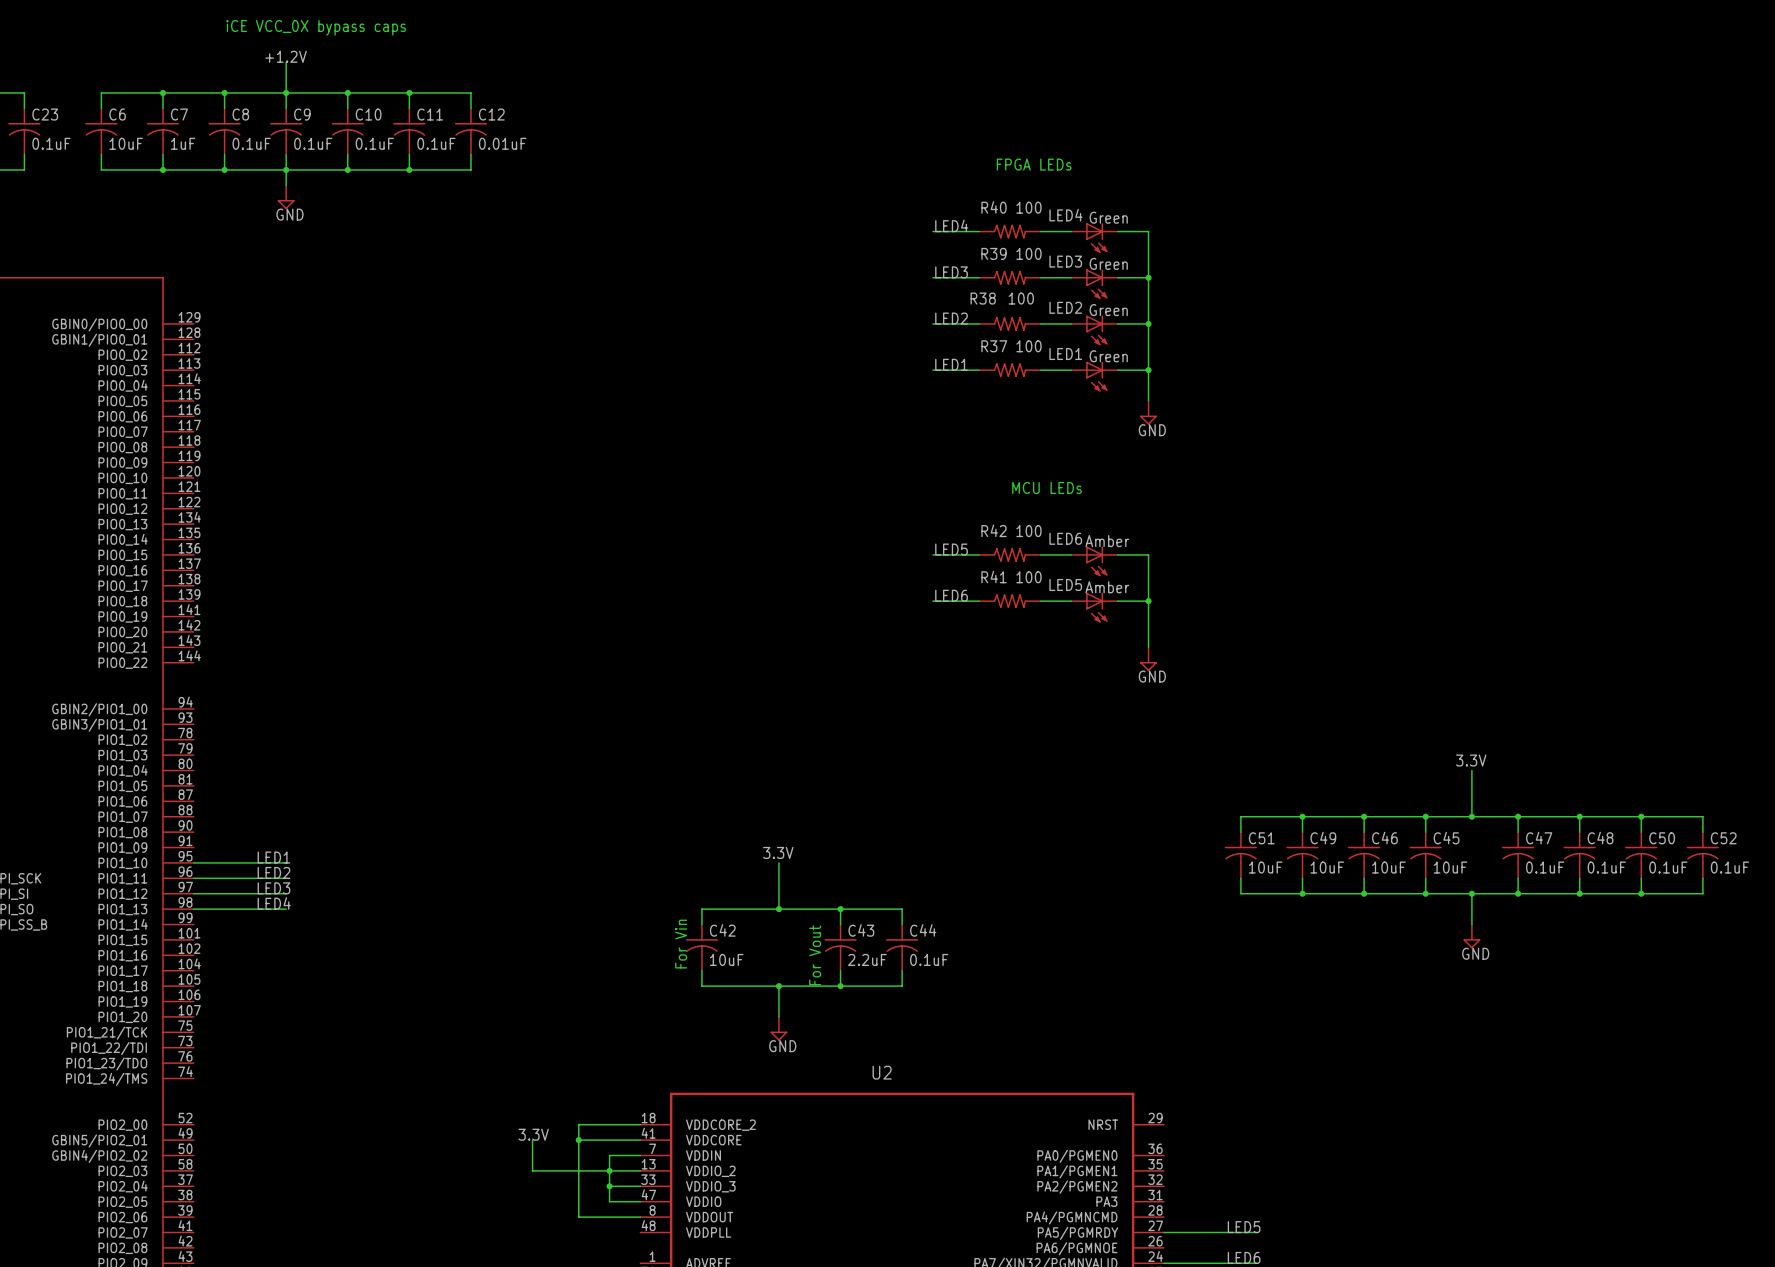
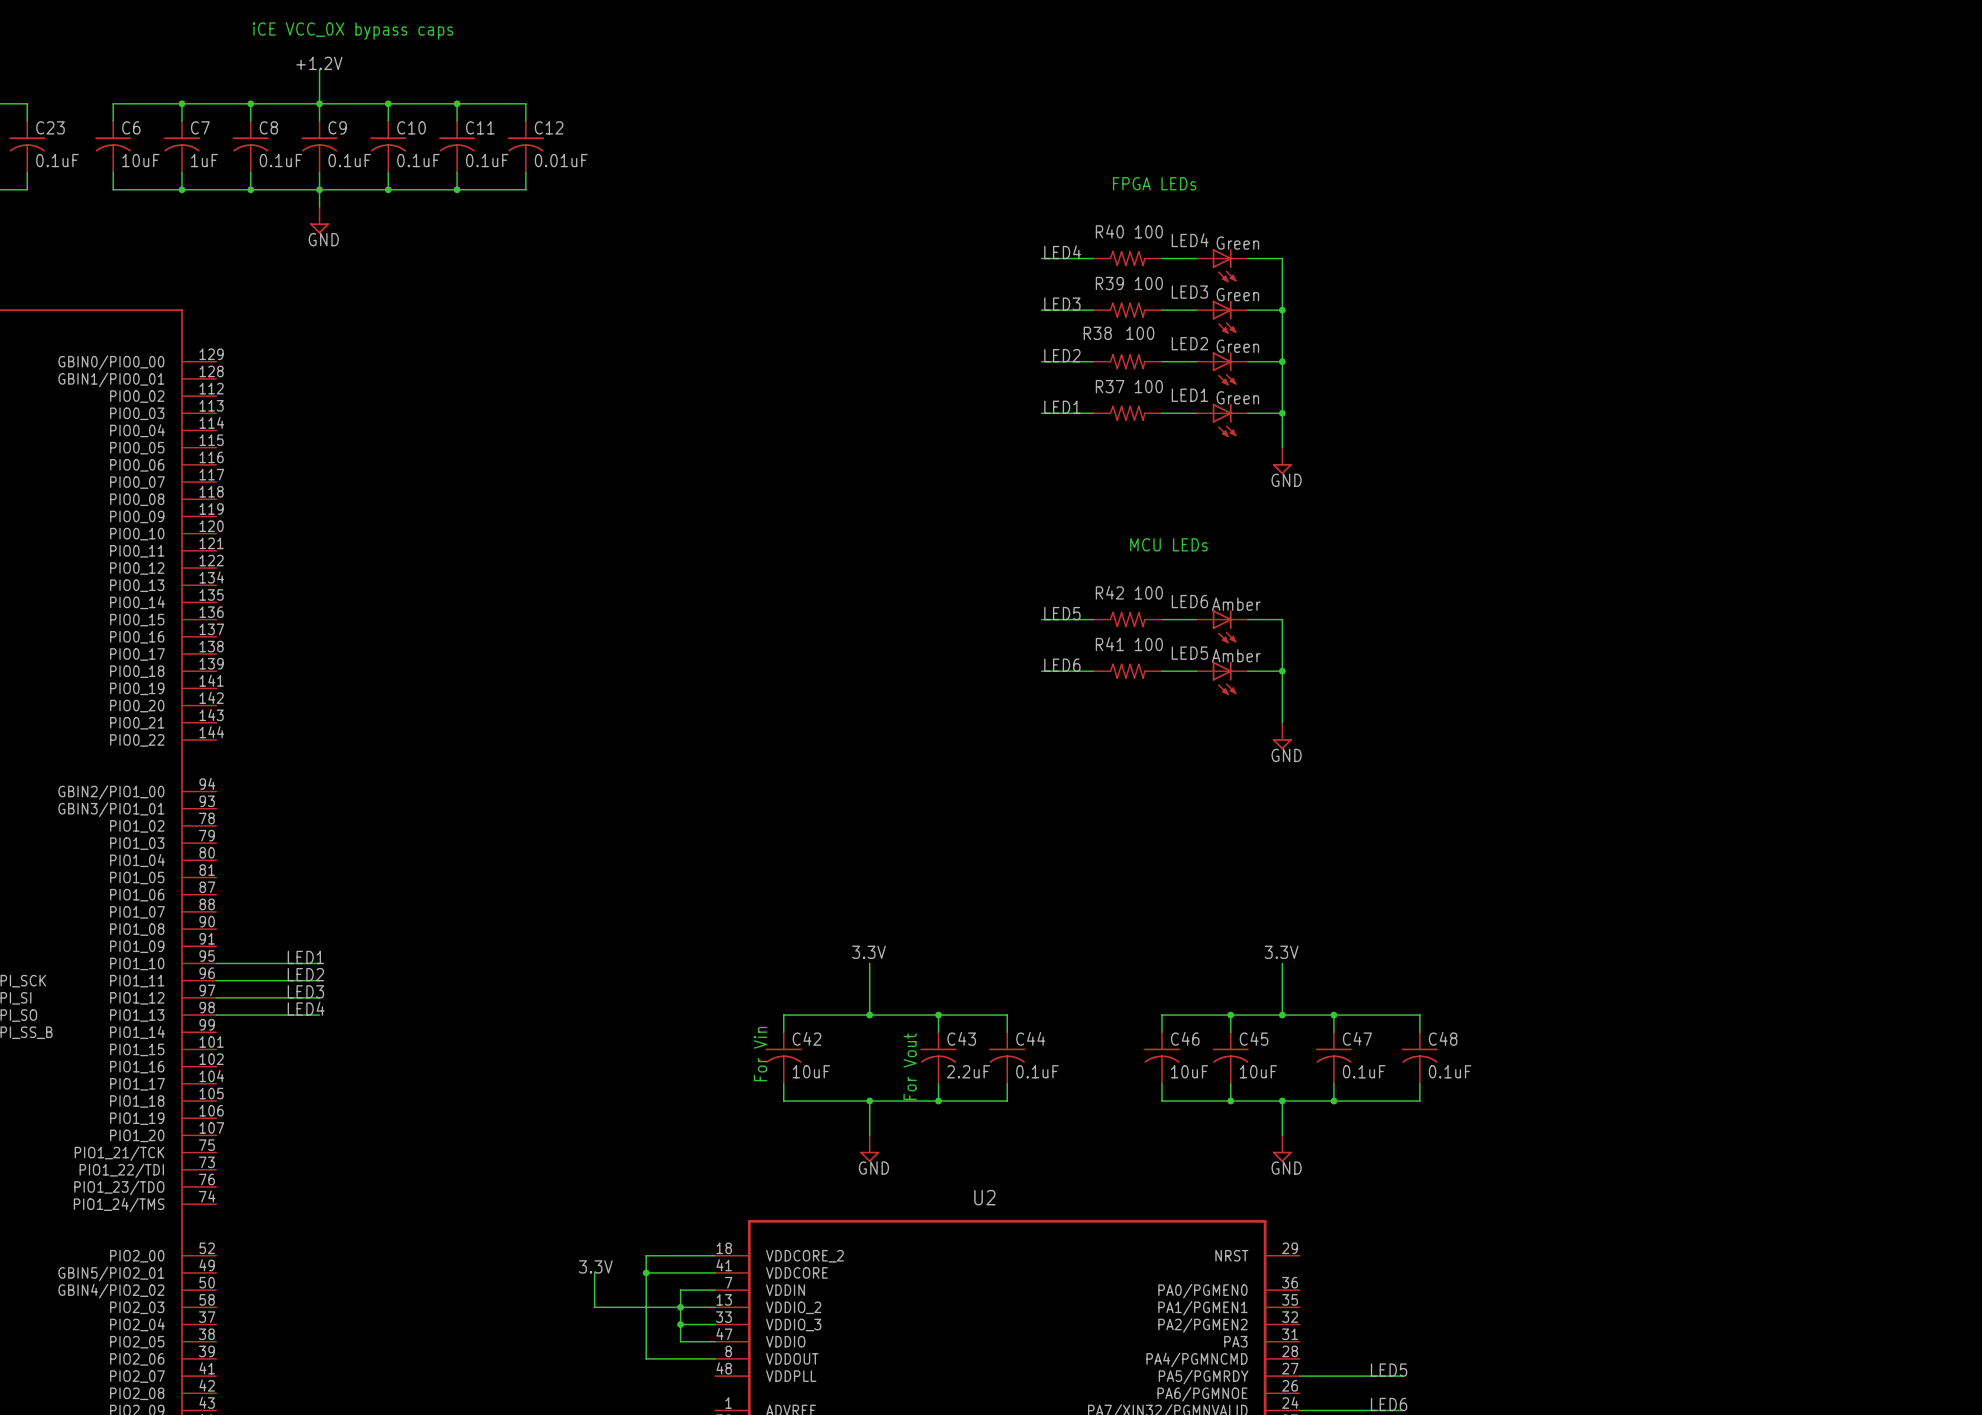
label: 3.3V (1471, 760) -> none
wire: (1471, 770) (1471, 816) -> none
wire: (1302, 816) (1302, 832) -> (1333, 1015) (1333, 1032)
junction: (1302, 816) -> none
wire: (1364, 816) (1364, 832) -> none
junction: (1364, 816) -> none
wire: (1425, 816) (1425, 832) -> none
junction: (1425, 816) -> none
junction: (1471, 816) -> none
wire: (1518, 816) (1518, 832) -> none
junction: (1518, 816) -> none
wire: (1579, 816) (1579, 832) -> none
junction: (1579, 816) -> none
wire: (1641, 816) (1641, 832) -> none
junction: (1641, 816) -> none
wire: (1240, 832) (1240, 816) (1702, 816) (1702, 832) -> none
label: none -> 3.3V (1281, 952)
C51: 10uF (1240, 855) -> none
C49: 10uF (1302, 855) -> none
C46 position: (1364, 855) -> (1161, 1058)
C45 position: (1425, 855) -> (1230, 1058)
C47 position: (1518, 855) -> (1333, 1058)
C48 position: (1579, 855) -> (1419, 1058)
C50: 0.1uF (1641, 855) -> none
C52: 0.1uF (1702, 855) -> none
wire: none -> (1282, 963) (1282, 1015)
wire: (1240, 878) (1240, 893) (1702, 893) (1702, 878) -> none
wire: (1302, 878) (1302, 893) -> (1333, 1083) (1333, 1101)
wire: (1364, 878) (1364, 893) -> none
wire: (1425, 878) (1425, 893) -> none
wire: (1518, 878) (1518, 893) -> none
wire: (1579, 878) (1579, 893) -> none
wire: (1641, 878) (1641, 893) -> none
junction: (1302, 893) -> none
junction: (1364, 893) -> none
junction: (1425, 893) -> none
wire: (1471, 893) (1471, 924) -> none
junction: (1471, 893) -> none
junction: (1518, 893) -> none
junction: (1579, 893) -> none
junction: (1641, 893) -> none
wire: none -> (1230, 1015) (1230, 1032)
junction: none -> (1230, 1015)
junction: none -> (1282, 1015)
junction: none -> (1333, 1015)
wire: none -> (1161, 1032) (1161, 1015) (1419, 1015) (1419, 1032)
power symbol: GND (1471, 936) -> none
wire: none -> (1161, 1083) (1161, 1101) (1419, 1101) (1419, 1083)
wire: none -> (1230, 1083) (1230, 1101)
junction: none -> (1230, 1101)
wire: none -> (1282, 1101) (1282, 1135)
junction: none -> (1282, 1101)
junction: none -> (1333, 1101)
power symbol: none -> GND (1282, 1148)

